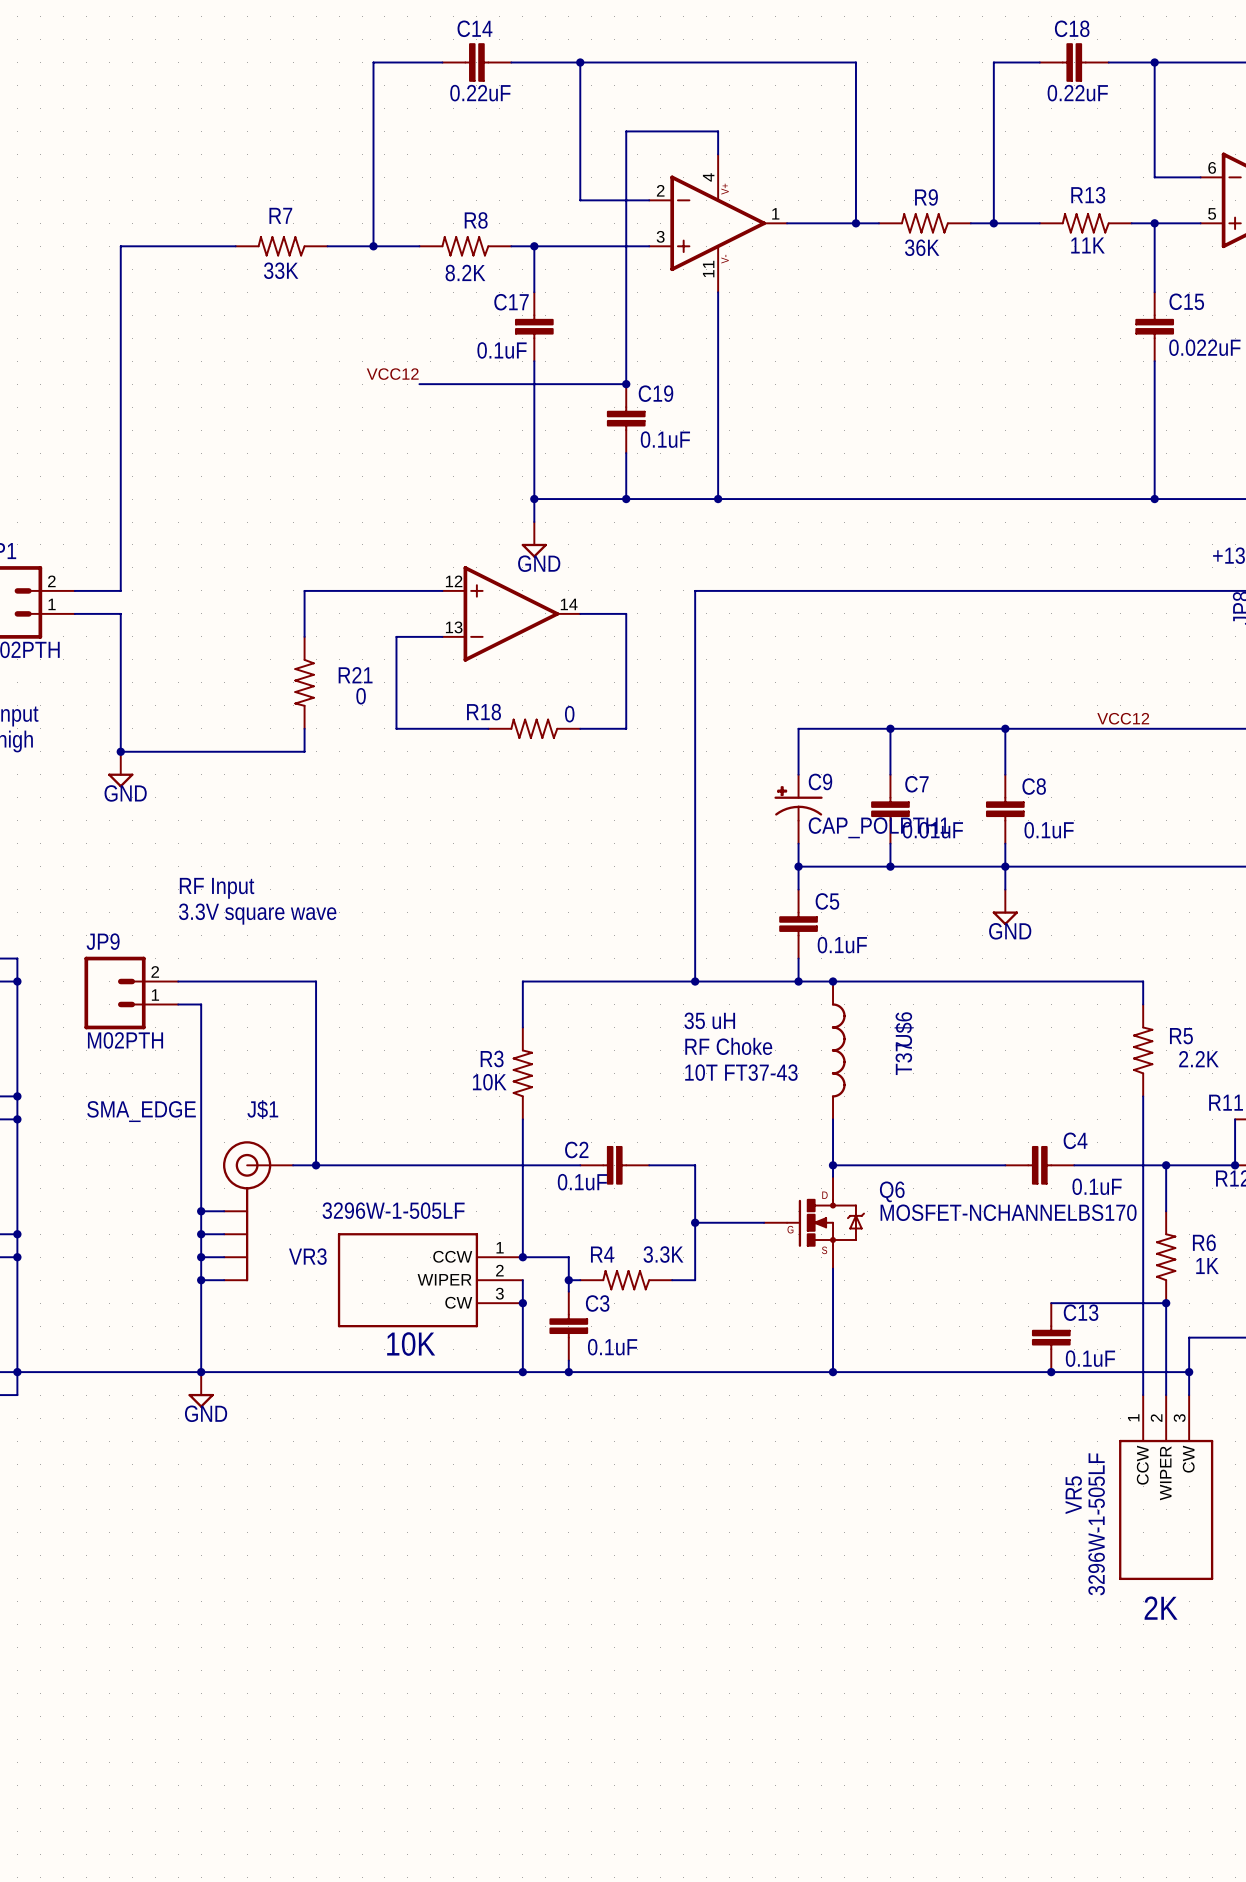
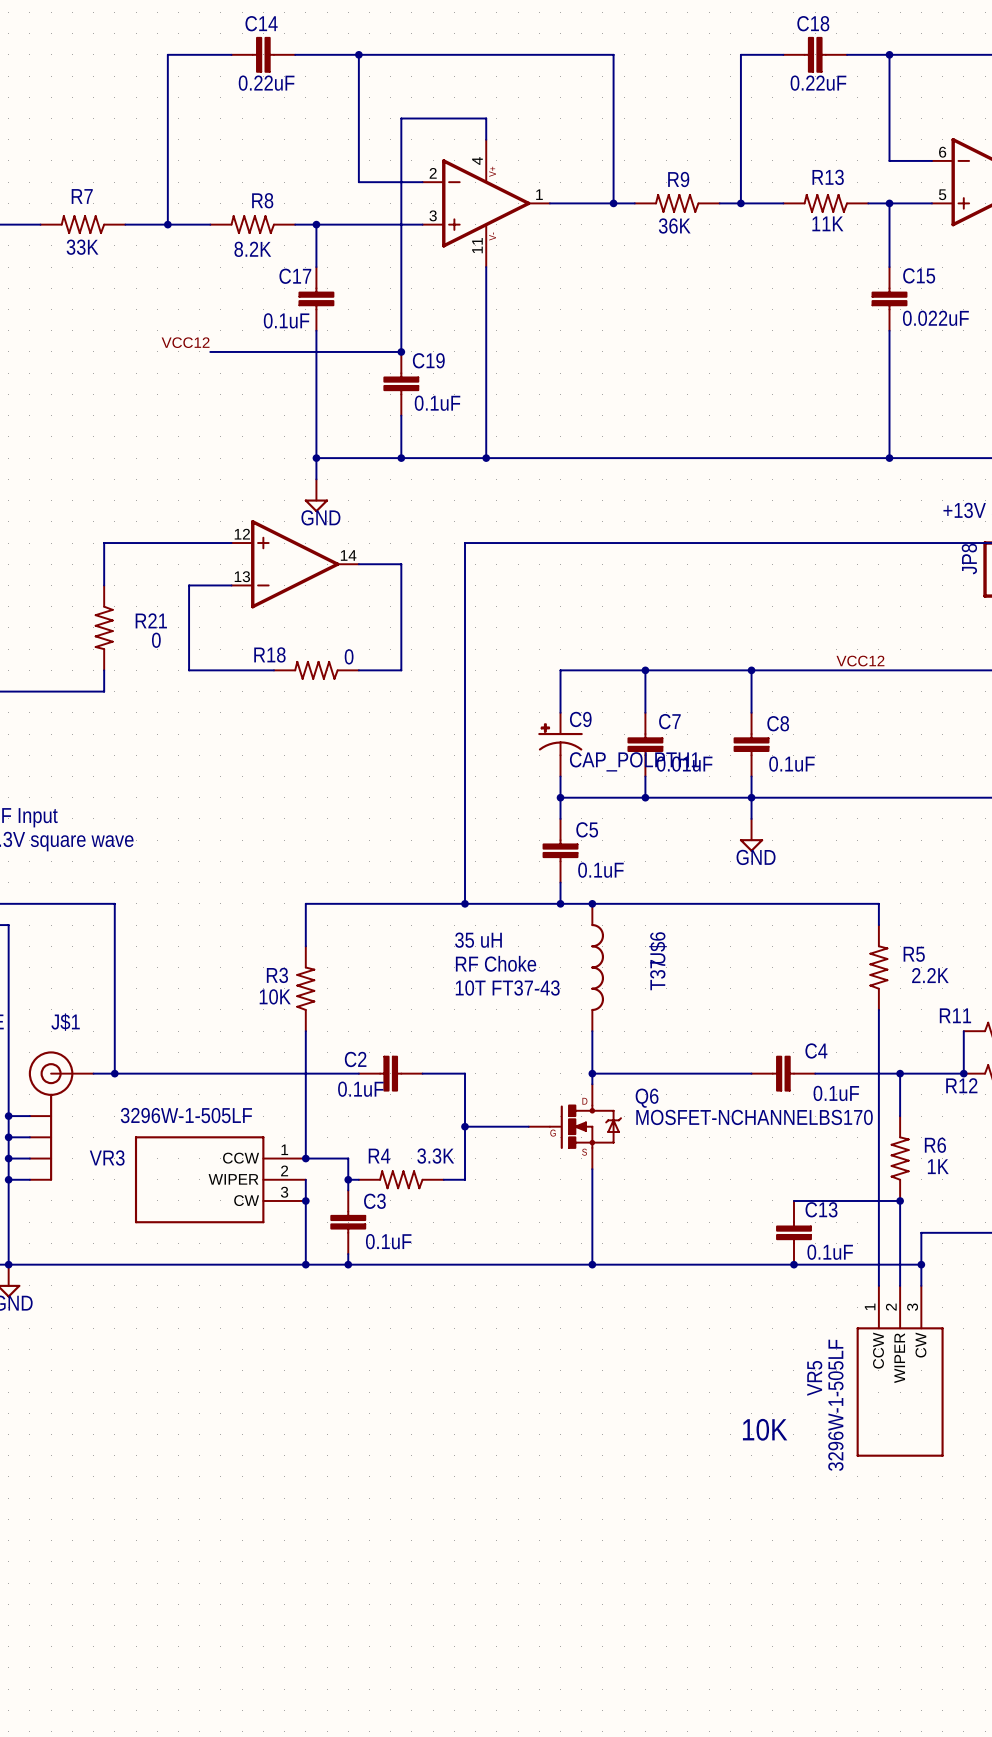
text: 10K (411, 1344) -> none
text: none -> 10K (765, 1429)
text: 2K (1161, 1608) -> none

